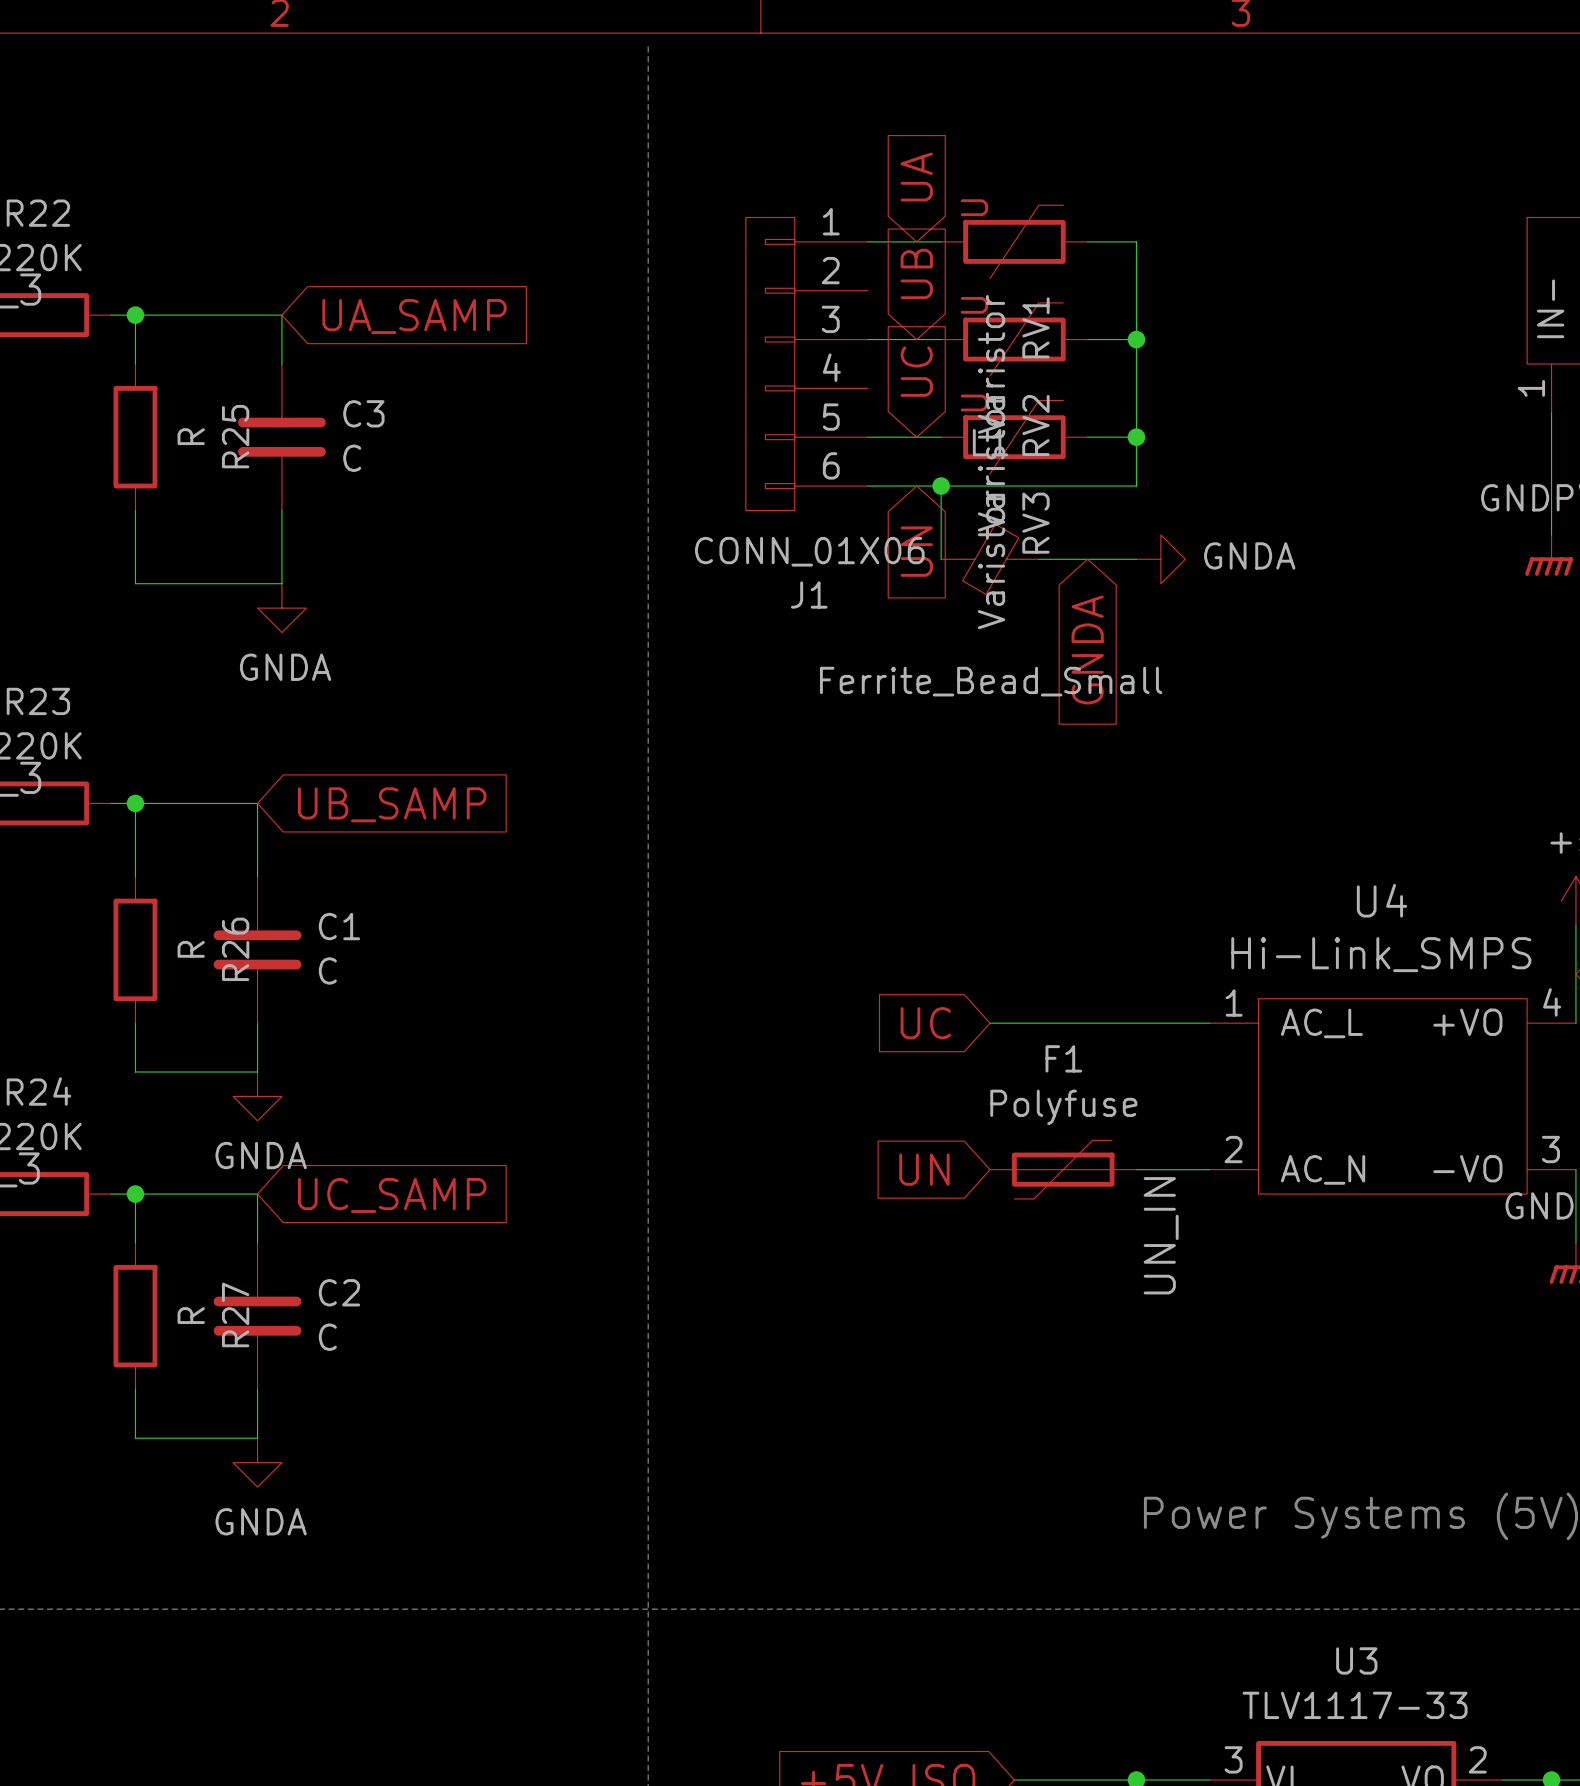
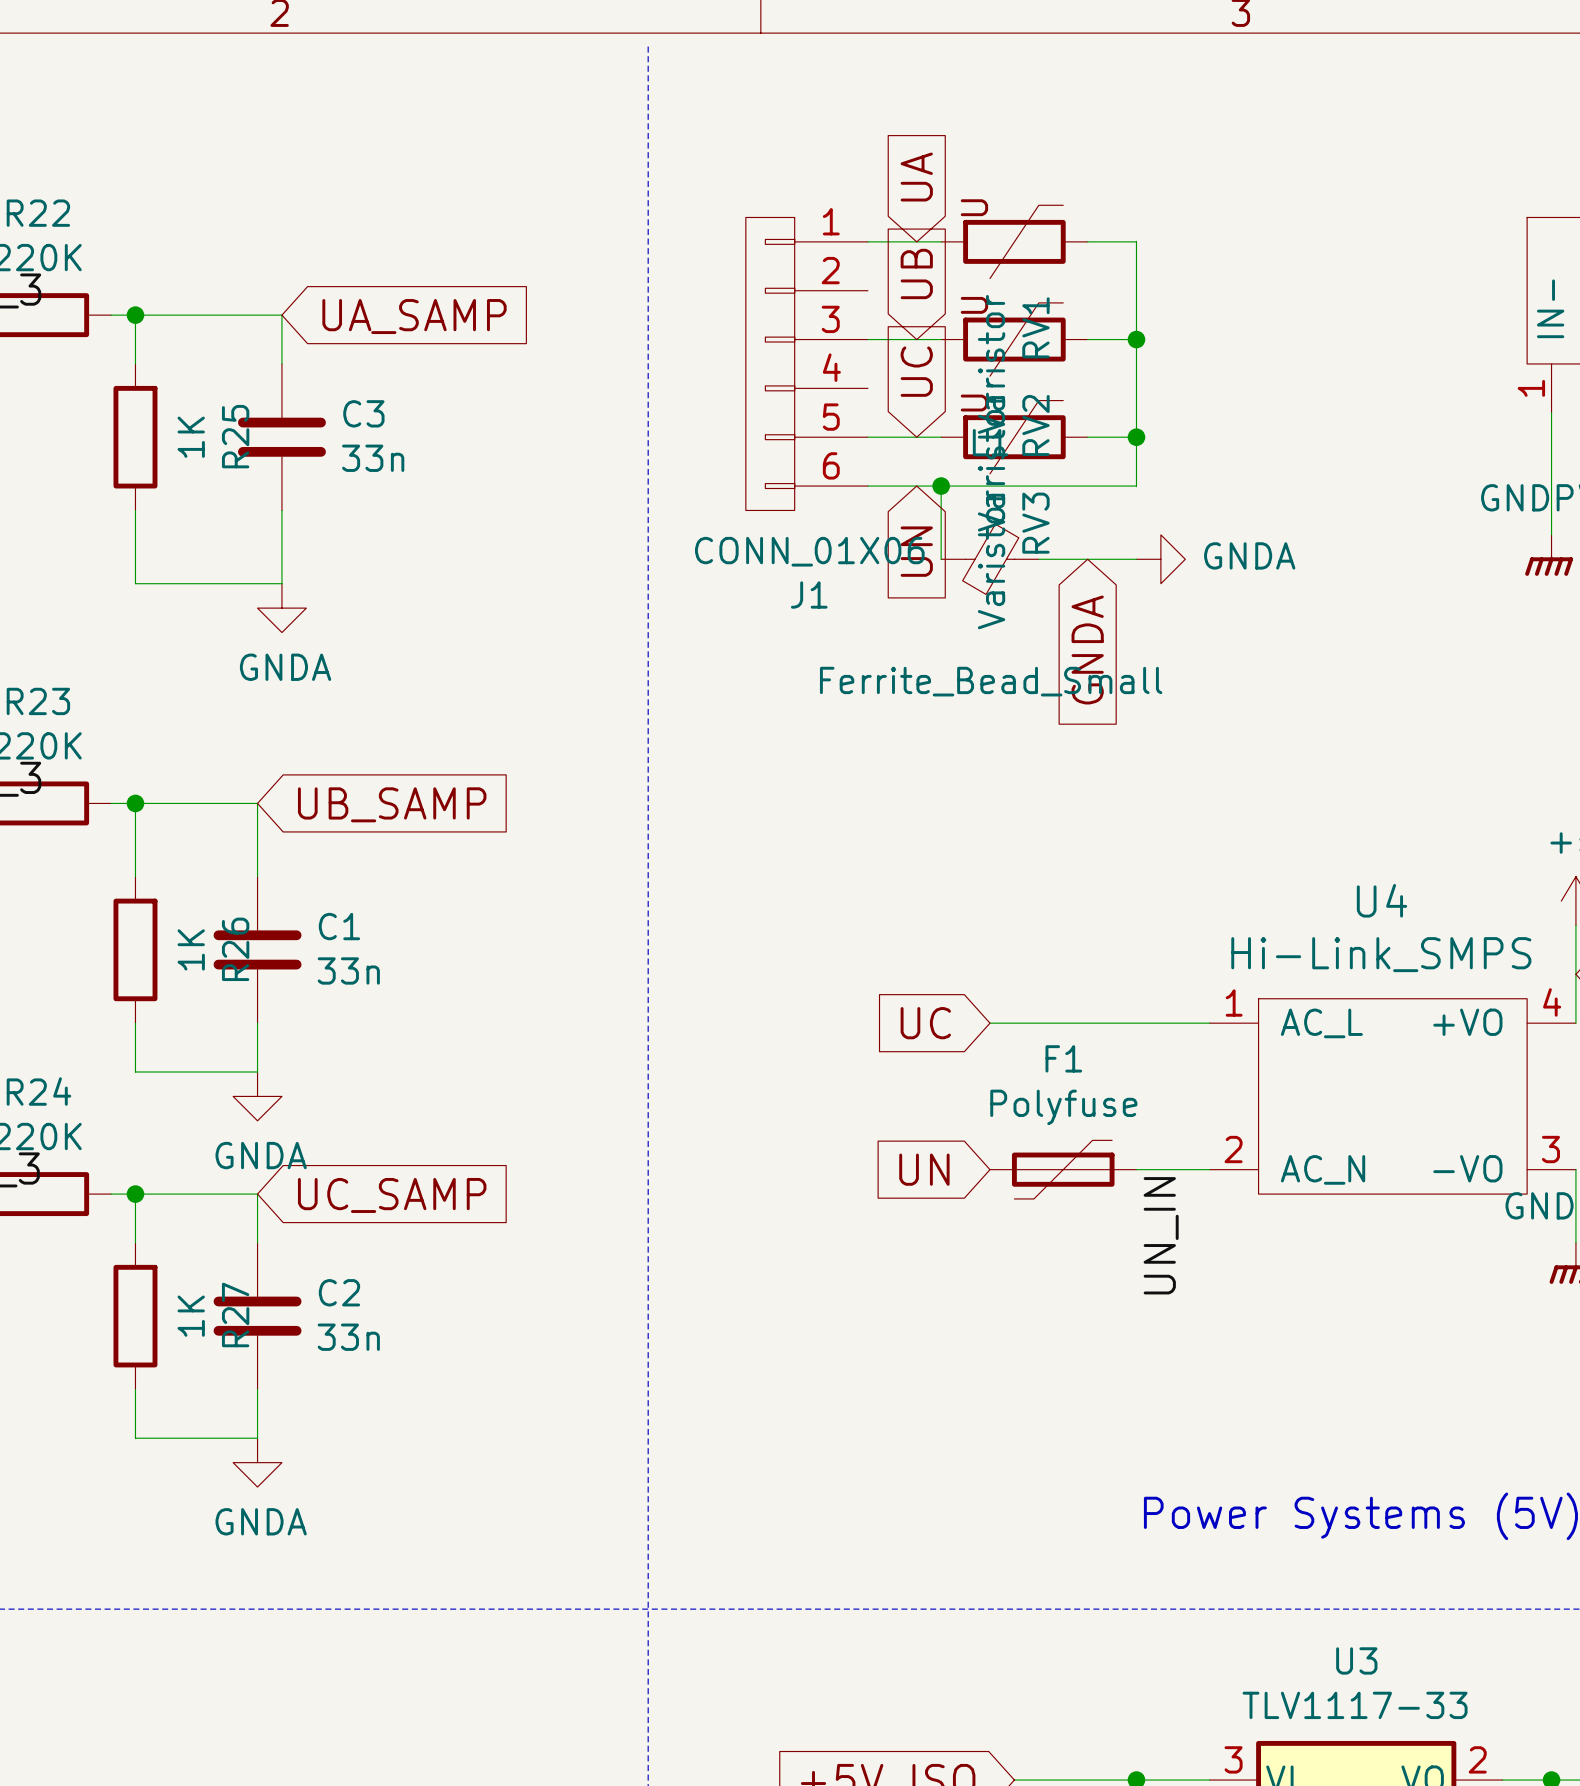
R25 value: R (191, 436) -> 1K (191, 437)
C3 value: C (352, 458) -> 33n (373, 458)
R26 value: R (191, 949) -> 1K (191, 949)
C1 value: C (327, 970) -> 33n (348, 970)
R27 value: R (191, 1315) -> 1K (191, 1316)
C2 value: C (327, 1337) -> 33n (348, 1337)

